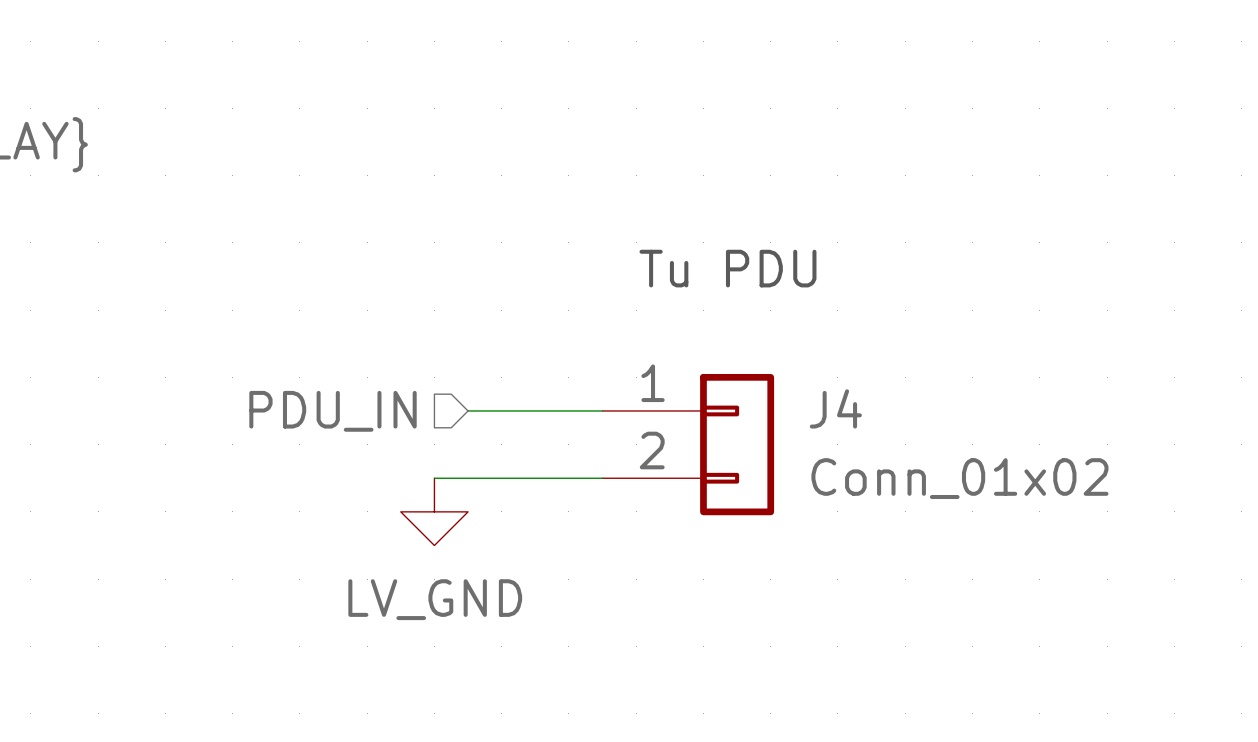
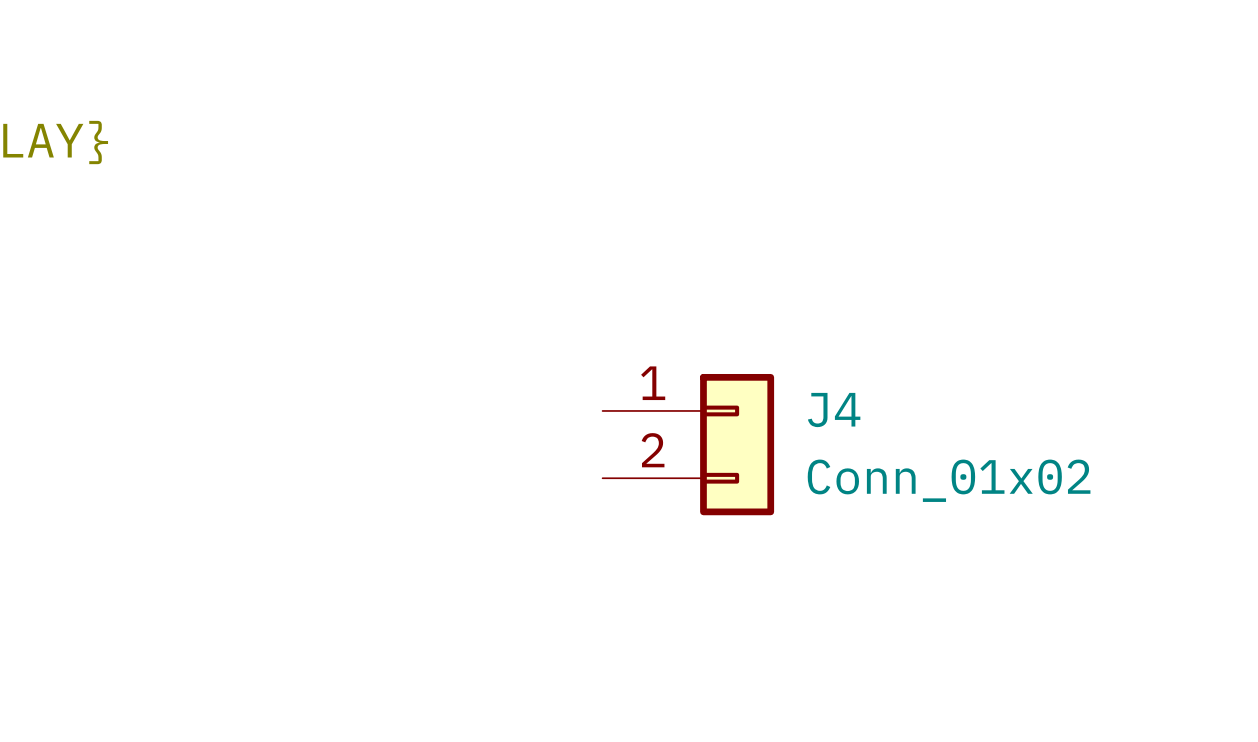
text: Tu PDU (727, 268) -> none
wire: (468, 410) (602, 410) -> none
hierarchical label: PDU_IN (333, 411) -> none
wire: (434, 478) (602, 478) -> none
power symbol: LV_GND (434, 511) -> none

